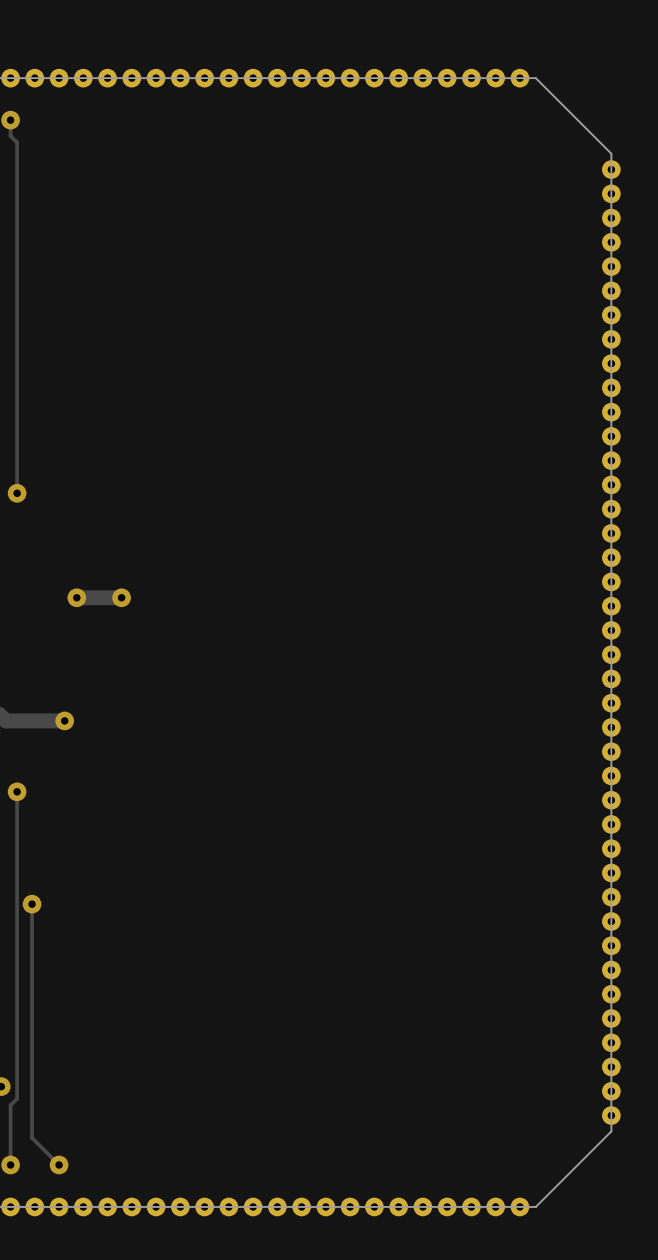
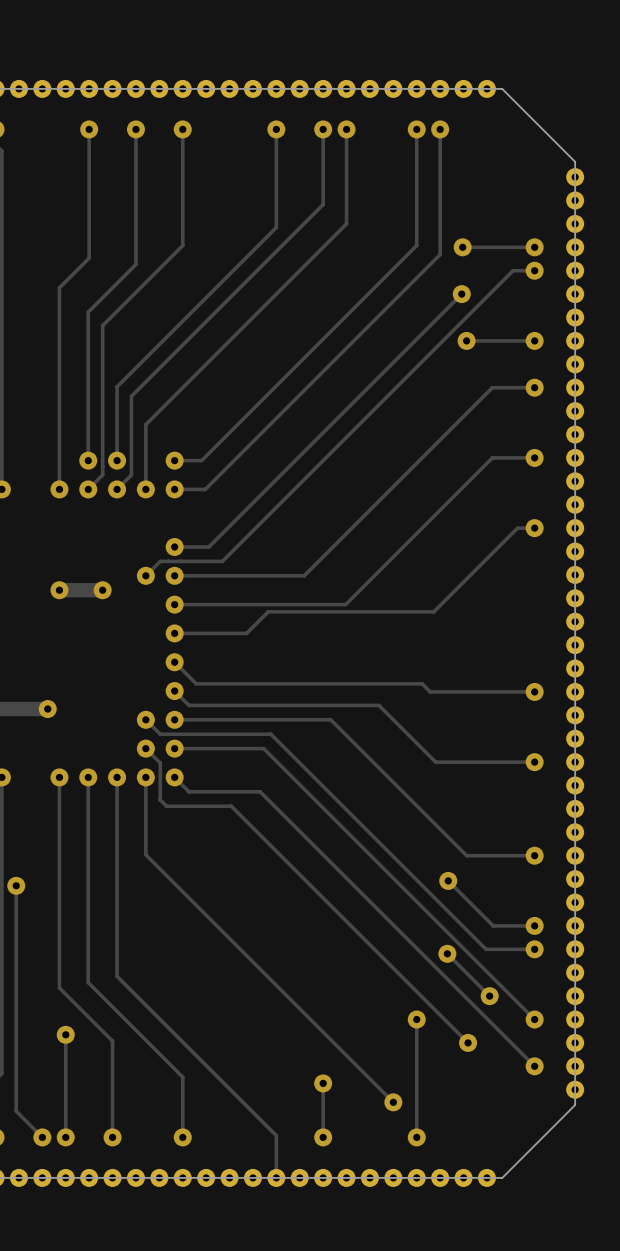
track: none -> (89, 129) (89, 258) (59, 287) (59, 489)
via: none -> (89, 129)
track: none -> (135, 129) (135, 264) (88, 312) (88, 460)
via: none -> (135, 129)
track: none -> (182, 129) (182, 245) (102, 325) (102, 474) (88, 489)
via: none -> (182, 129)
track: none -> (276, 129) (276, 227) (117, 386) (117, 460)
via: none -> (276, 129)
track: none -> (323, 129) (323, 204) (131, 396) (131, 475) (117, 489)
via: none -> (323, 129)
track: none -> (346, 129) (346, 223) (145, 424) (145, 489)
via: none -> (346, 129)
track: none -> (416, 129) (416, 245) (201, 460) (174, 460)
via: none -> (416, 129)
track: none -> (440, 129) (440, 254) (205, 489) (174, 489)
via: none -> (440, 129)
via: none -> (462, 247)
track: none -> (534, 247) (462, 247)
via: none -> (534, 247)
track: none -> (534, 270) (513, 270) (222, 561) (160, 561) (145, 575)
via: none -> (534, 270)
track: none -> (461, 294) (208, 546) (174, 546)
via: none -> (461, 294)
via: none -> (466, 340)
track: none -> (534, 340) (466, 340)
via: none -> (534, 340)
track: none -> (534, 387) (492, 387) (304, 575) (174, 575)
via: none -> (534, 387)
track: none -> (534, 457) (492, 457) (345, 604) (174, 604)
via: none -> (534, 457)
via: none -> (88, 460)
via: none -> (117, 460)
via: none -> (174, 460)
via: none -> (59, 489)
via: none -> (88, 489)
via: none -> (117, 489)
via: none -> (145, 489)
via: none -> (174, 489)
track: none -> (534, 528) (517, 528) (433, 611) (268, 611) (246, 633) (174, 633)
via: none -> (534, 528)
via: none -> (174, 546)
via: none -> (145, 575)
via: none -> (174, 575)
via: none -> (174, 604)
via: none -> (174, 633)
track: none -> (174, 662) (196, 683) (422, 683) (430, 691) (534, 691)
via: none -> (174, 662)
track: none -> (174, 691) (189, 705) (378, 705) (435, 762) (534, 762)
via: none -> (174, 691)
via: none -> (534, 691)
track: none -> (145, 719) (160, 734) (270, 734) (486, 949) (534, 949)
via: none -> (145, 719)
track: none -> (174, 719) (330, 719) (466, 855) (534, 855)
via: none -> (174, 719)
track: none -> (145, 748) (160, 763) (160, 799) (166, 806) (231, 806) (468, 1042)
via: none -> (145, 748)
track: none -> (174, 748) (263, 748) (534, 1019)
via: none -> (174, 748)
via: none -> (534, 762)
track: none -> (59, 777) (59, 988) (112, 1041) (112, 1137)
via: none -> (59, 777)
track: none -> (88, 777) (88, 982) (182, 1077) (182, 1137)
via: none -> (88, 777)
track: none -> (117, 777) (117, 976) (276, 1135) (276, 1176)
via: none -> (117, 777)
track: none -> (145, 777) (145, 854) (393, 1102)
via: none -> (145, 777)
track: none -> (174, 777) (189, 791) (260, 791) (534, 1066)
via: none -> (174, 777)
via: none -> (534, 855)
track: none -> (448, 880) (493, 925) (534, 925)
via: none -> (448, 880)
via: none -> (534, 925)
via: none -> (534, 949)
track: none -> (447, 953) (489, 996)
via: none -> (447, 953)
via: none -> (489, 996)
track: none -> (416, 1019) (416, 1137)
via: none -> (416, 1019)
via: none -> (534, 1019)
track: none -> (65, 1034) (65, 1137)
via: none -> (65, 1034)
via: none -> (468, 1042)
via: none -> (534, 1066)
track: none -> (323, 1083) (323, 1137)
via: none -> (323, 1083)
via: none -> (393, 1102)
via: none -> (65, 1137)
via: none -> (112, 1137)
via: none -> (182, 1137)
via: none -> (323, 1137)
via: none -> (416, 1137)

